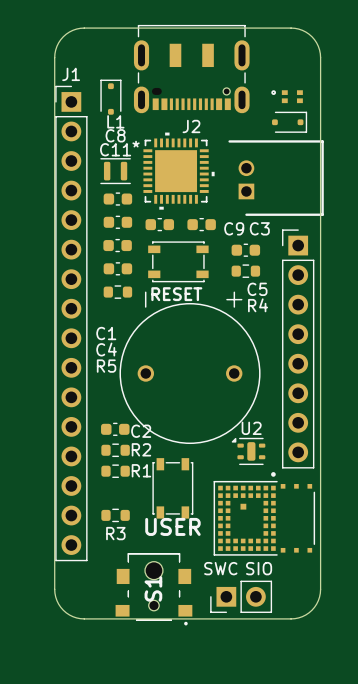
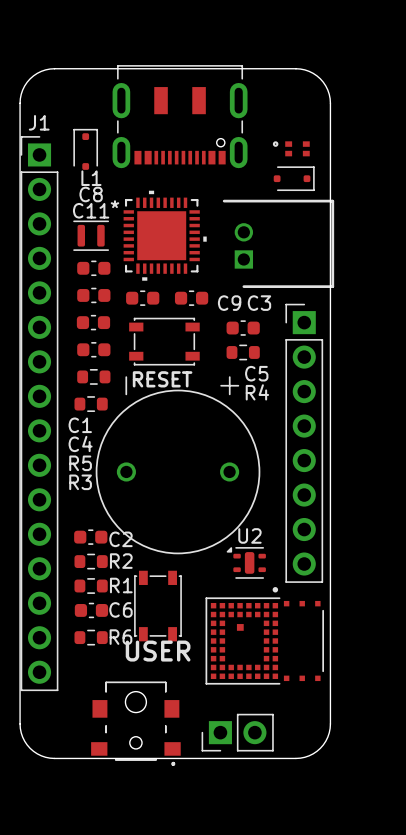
J2 name: J2 (191, 126) -> none
R3: none -> (91, 404)
C6: none -> (91, 610)
R3 name: R3 (115, 533) -> R6 (120, 637)
text: SWC (220, 568) -> none
text: SIO (259, 568) -> none
S1 name: S1 (153, 588) -> none

